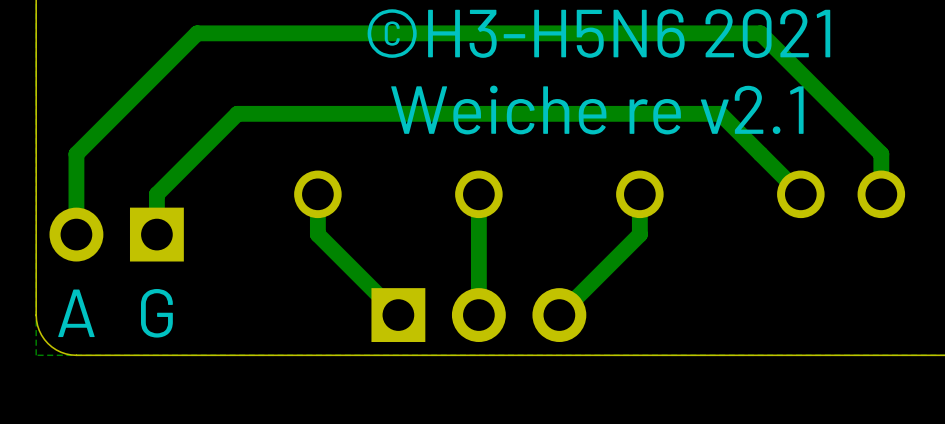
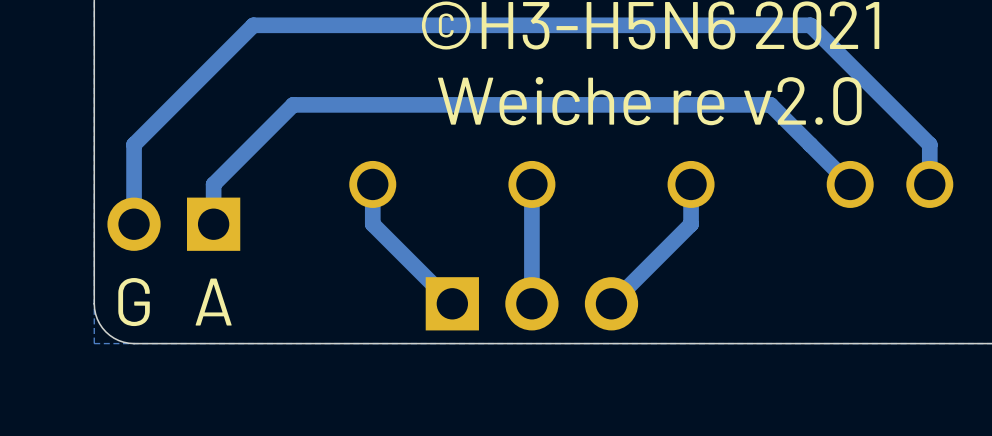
text: Weiche re v2.1 (597, 110) -> Weiche re v2.0 (649, 101)
text: A (76, 313) -> G (134, 302)
text: G (156, 313) -> A (213, 302)

